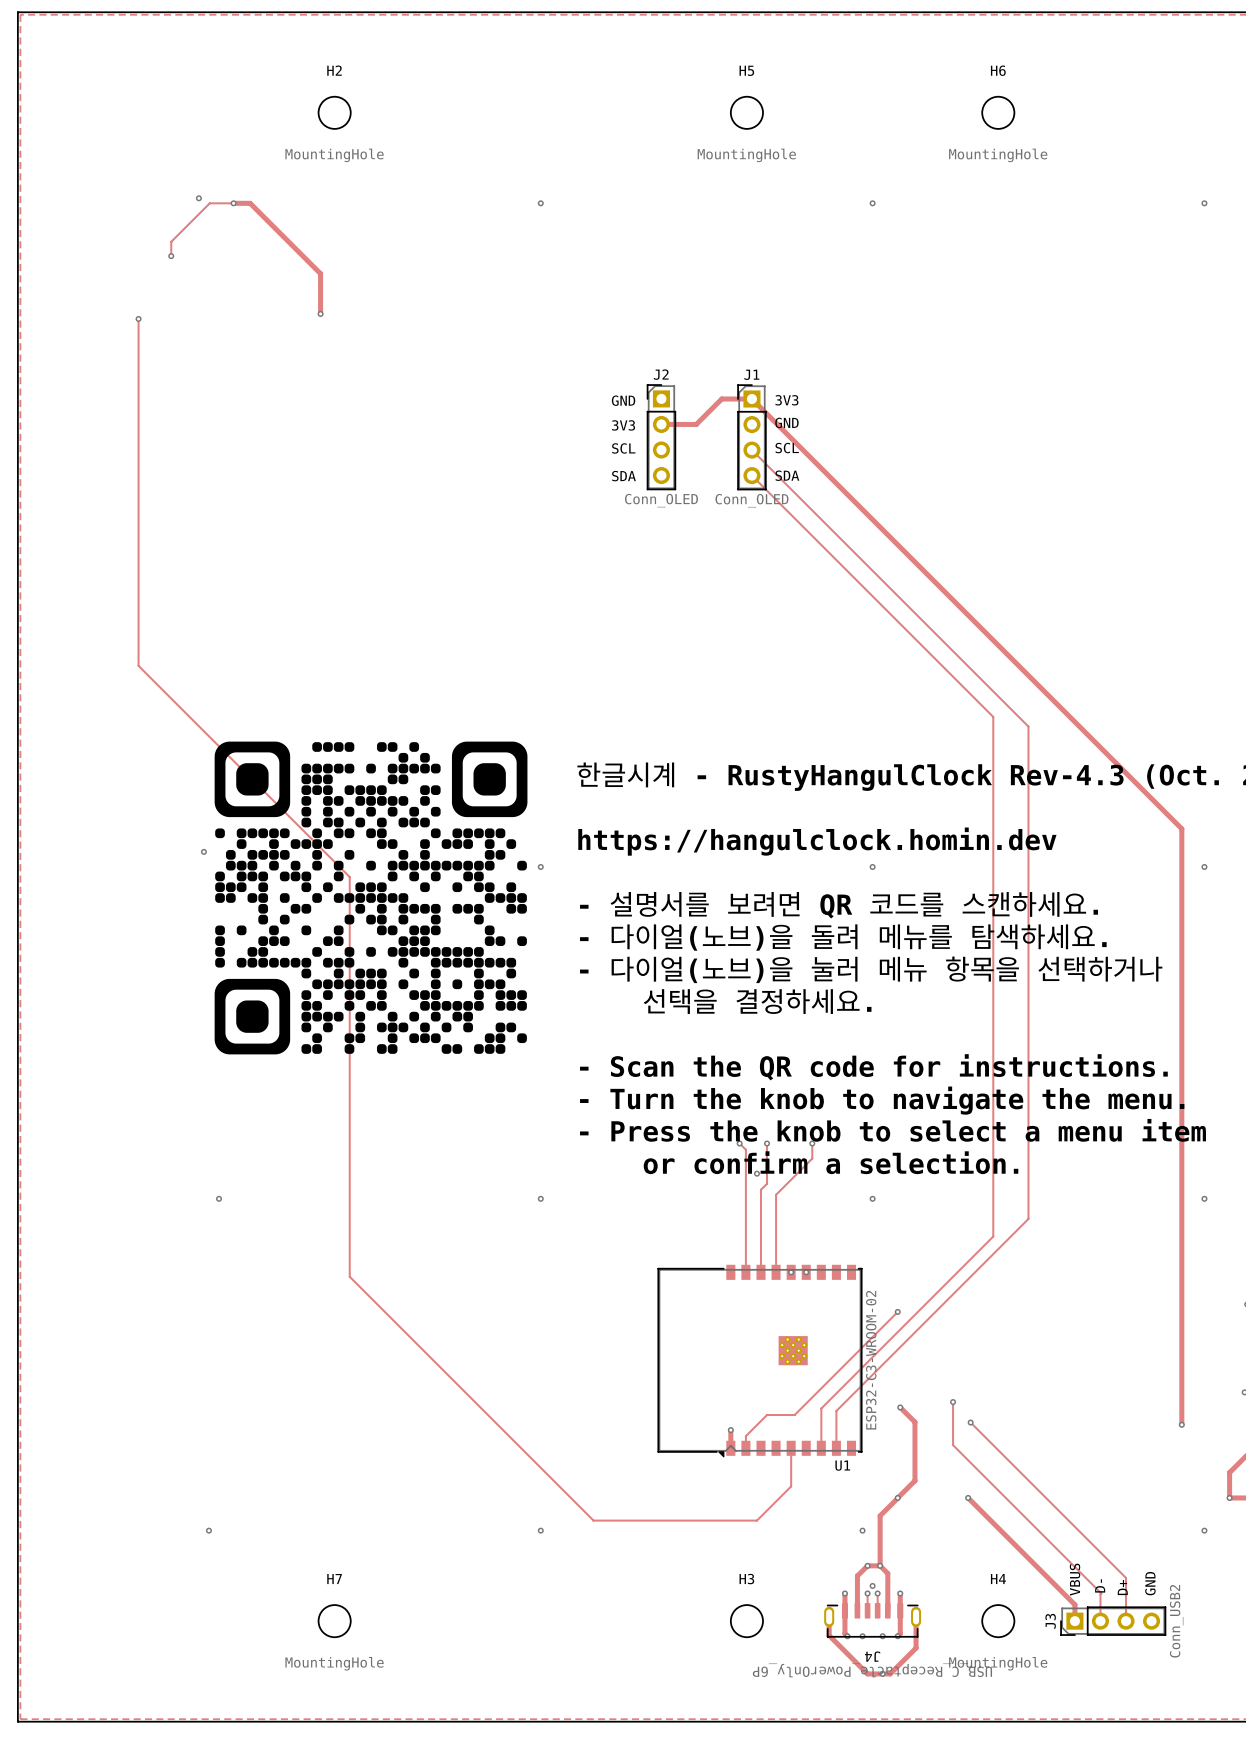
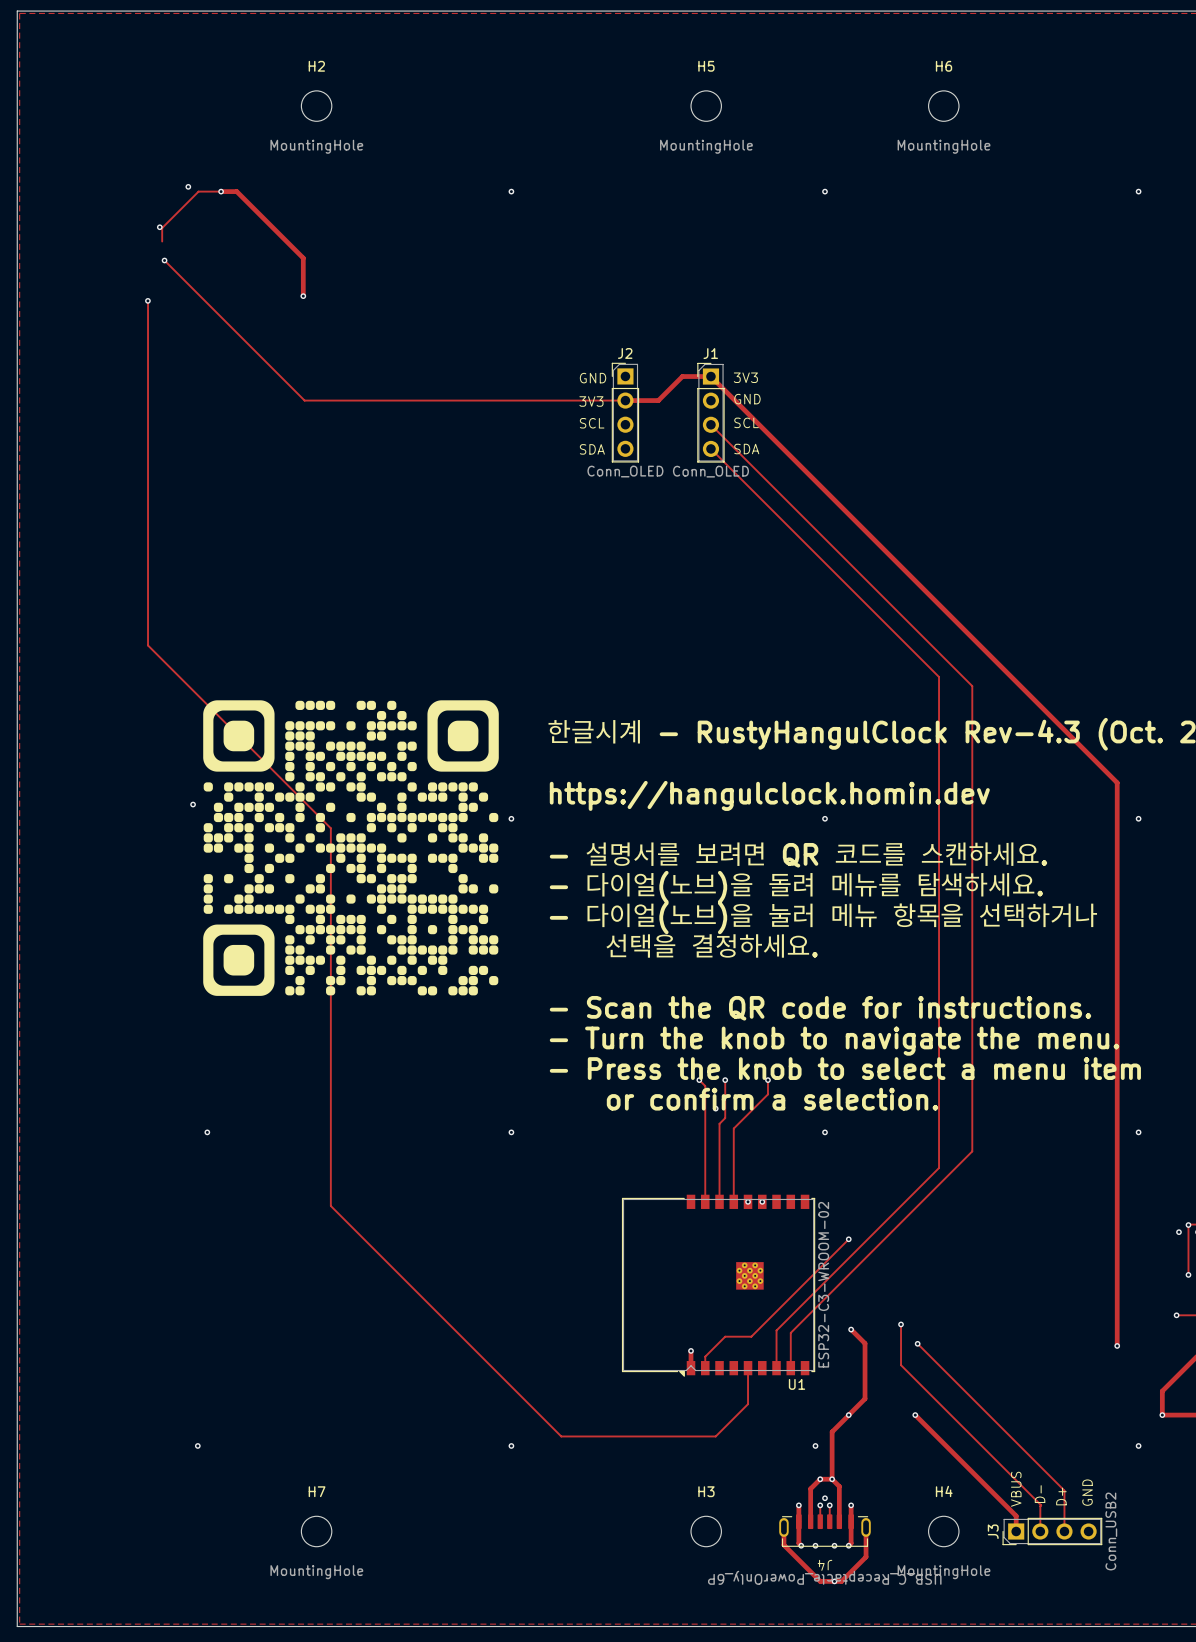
via: none -> (159, 227)
via: (171, 256) -> none
track: none -> (164, 260) (304, 400) (625, 400)
via: none -> (164, 260)
track: (138, 318) (138, 665) (156, 683) -> (148, 300) (148, 645)
via position: (138, 318) -> (147, 300)

